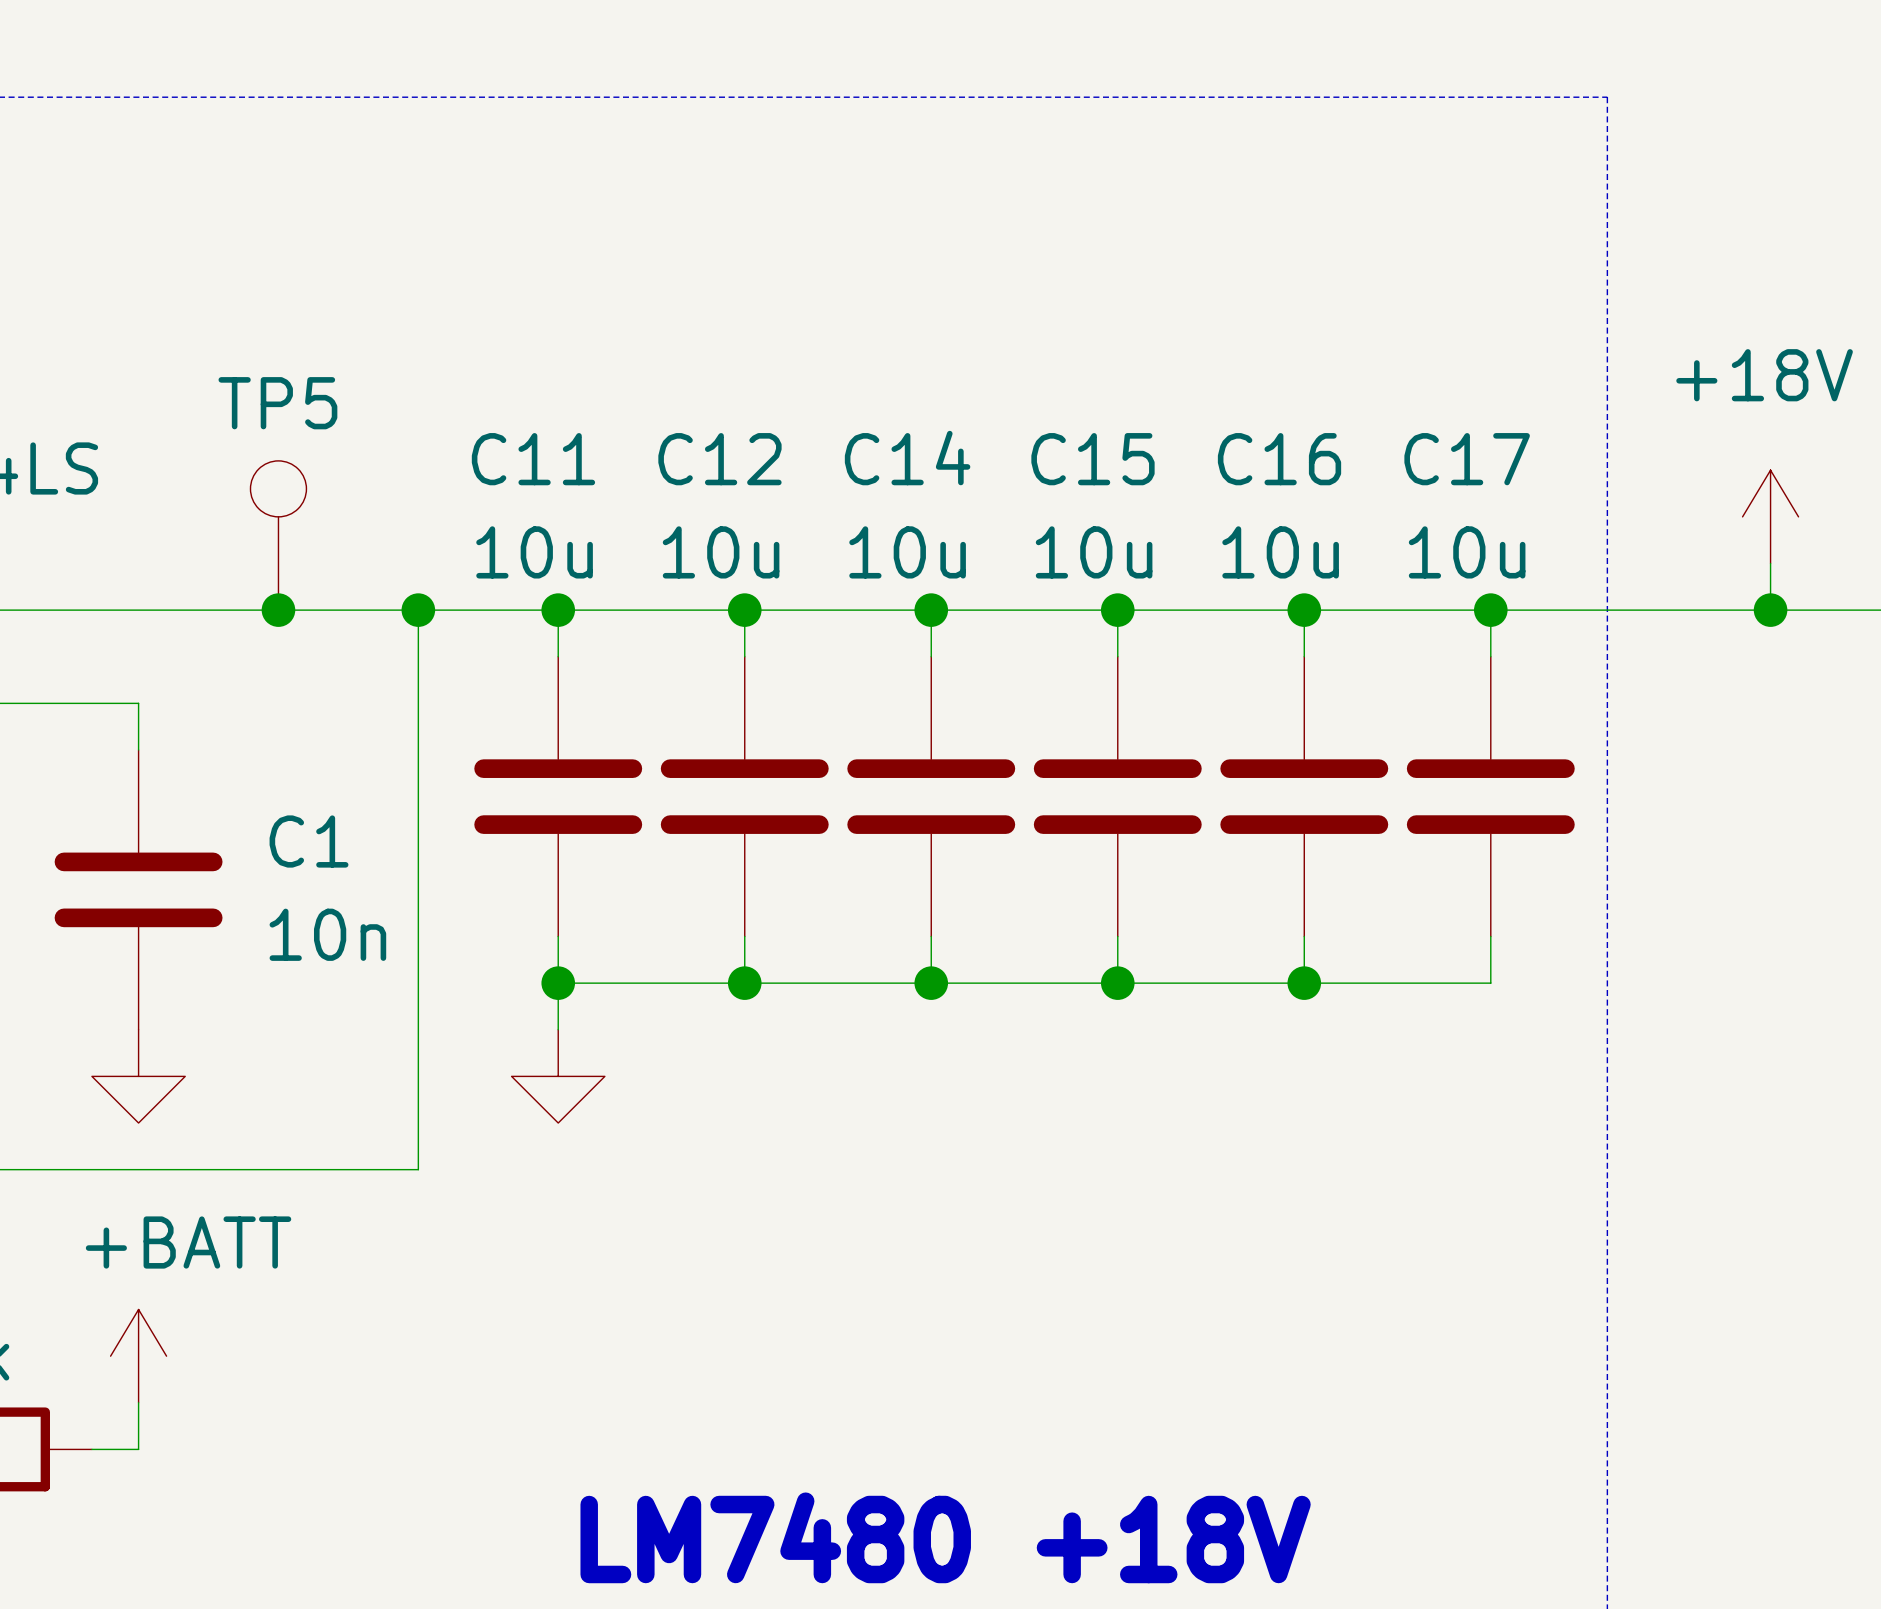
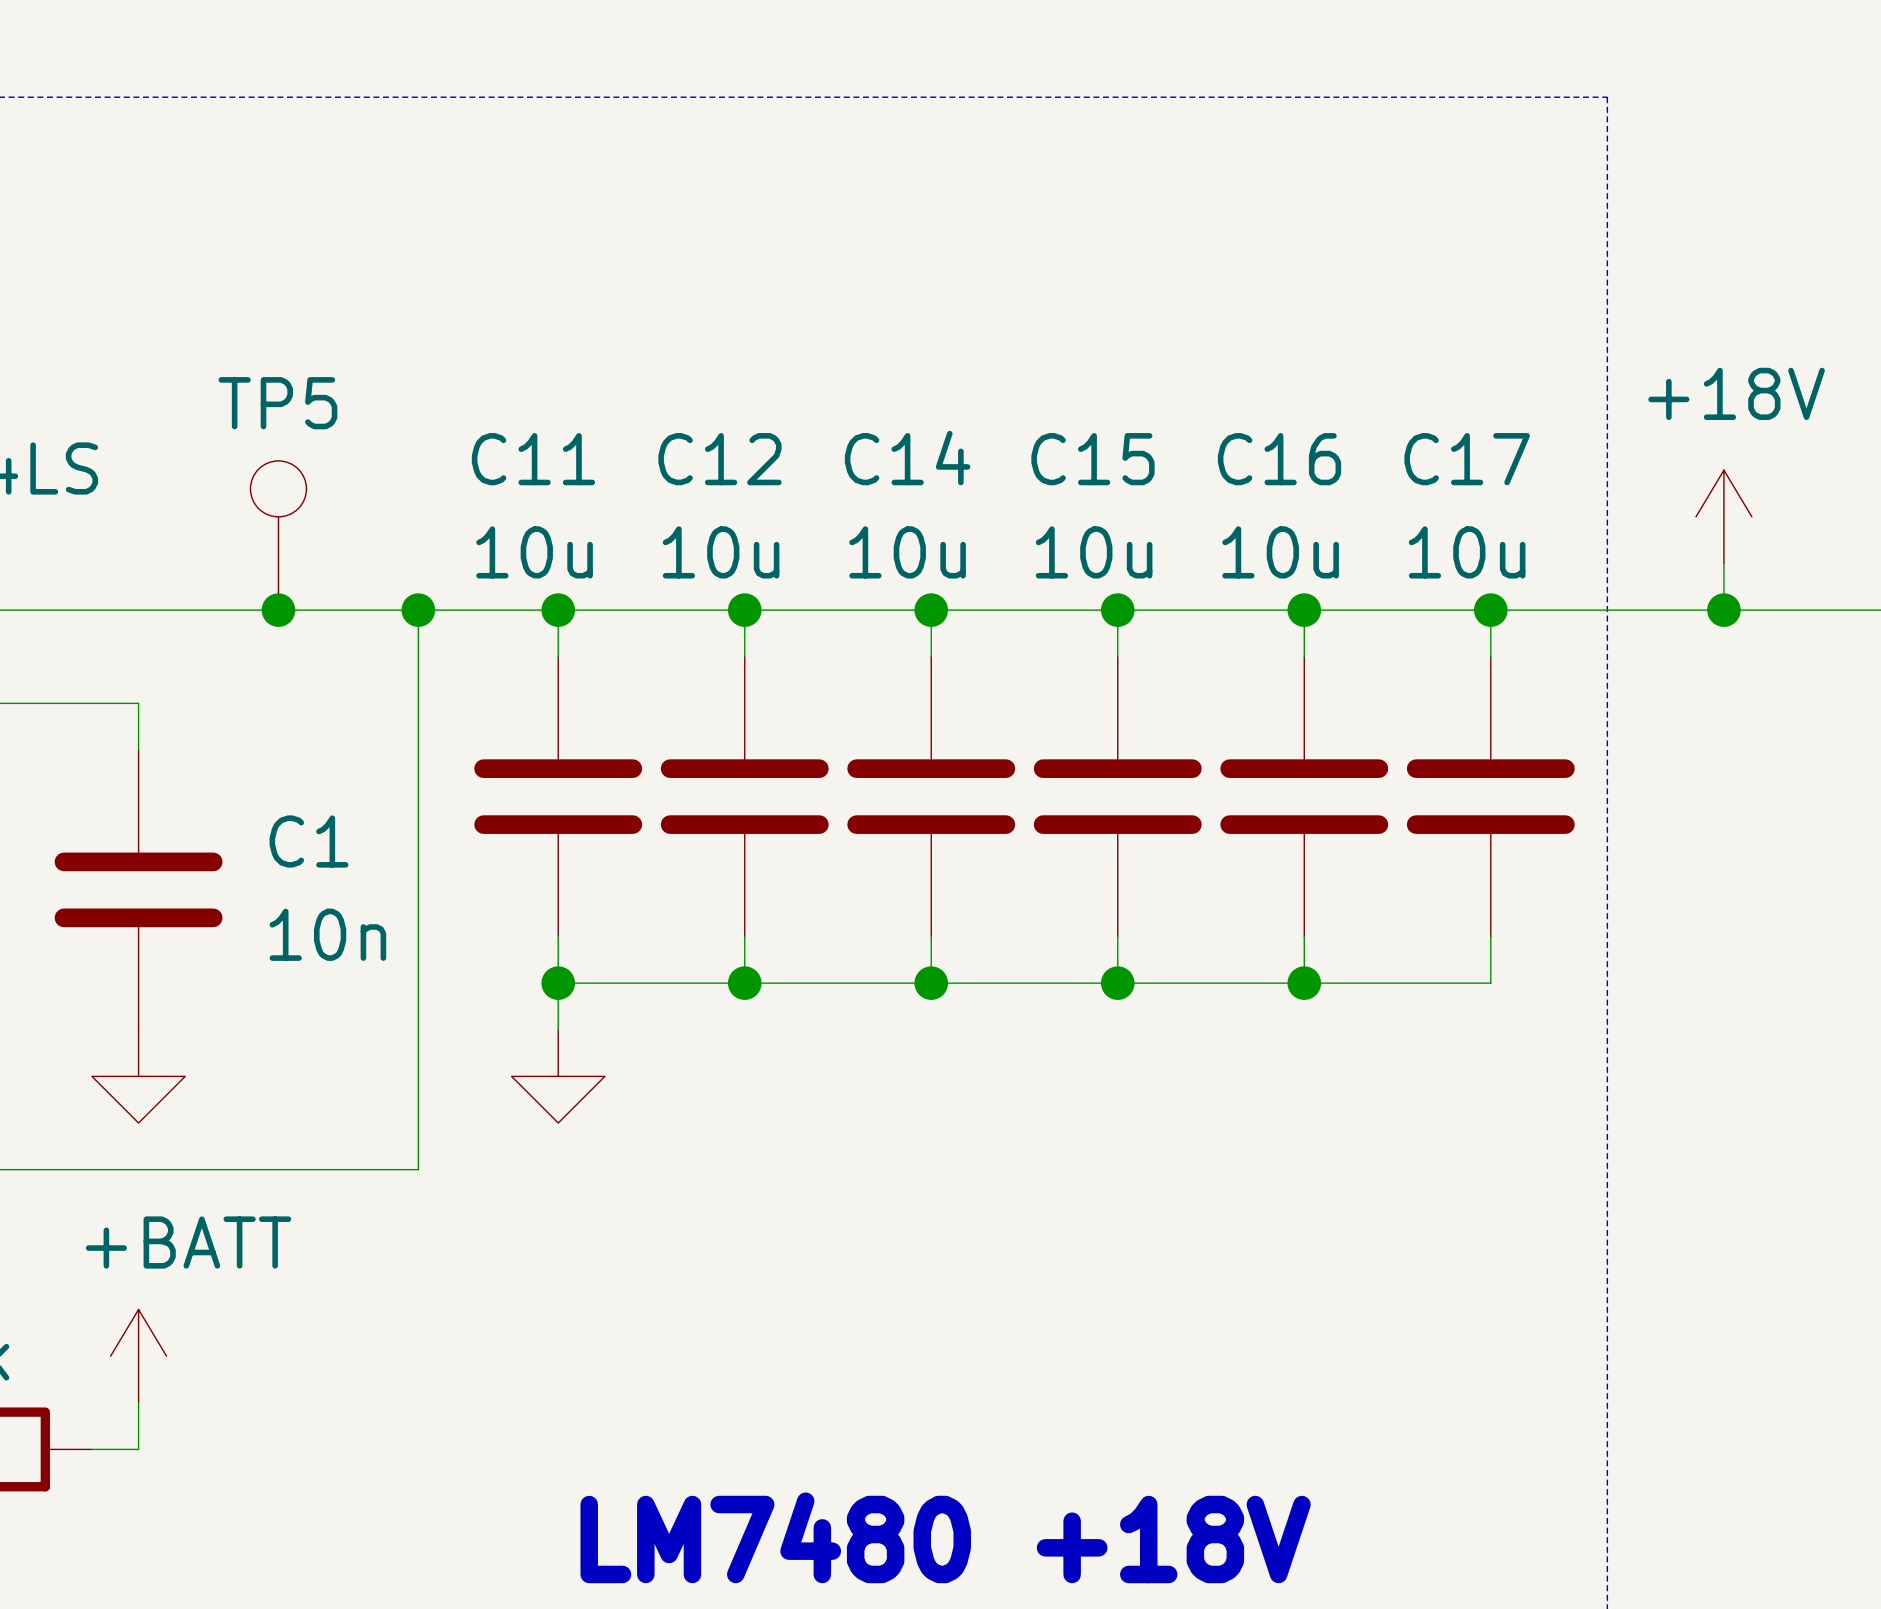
power symbol text position: +18V (1764, 375) -> +18V (1736, 393)
power symbol position: +18V (1770, 516) -> +18V (1723, 516)
wire: (1770, 563) (1770, 610) -> (1723, 563) (1723, 610)
junction position: (1770, 610) -> (1723, 610)

